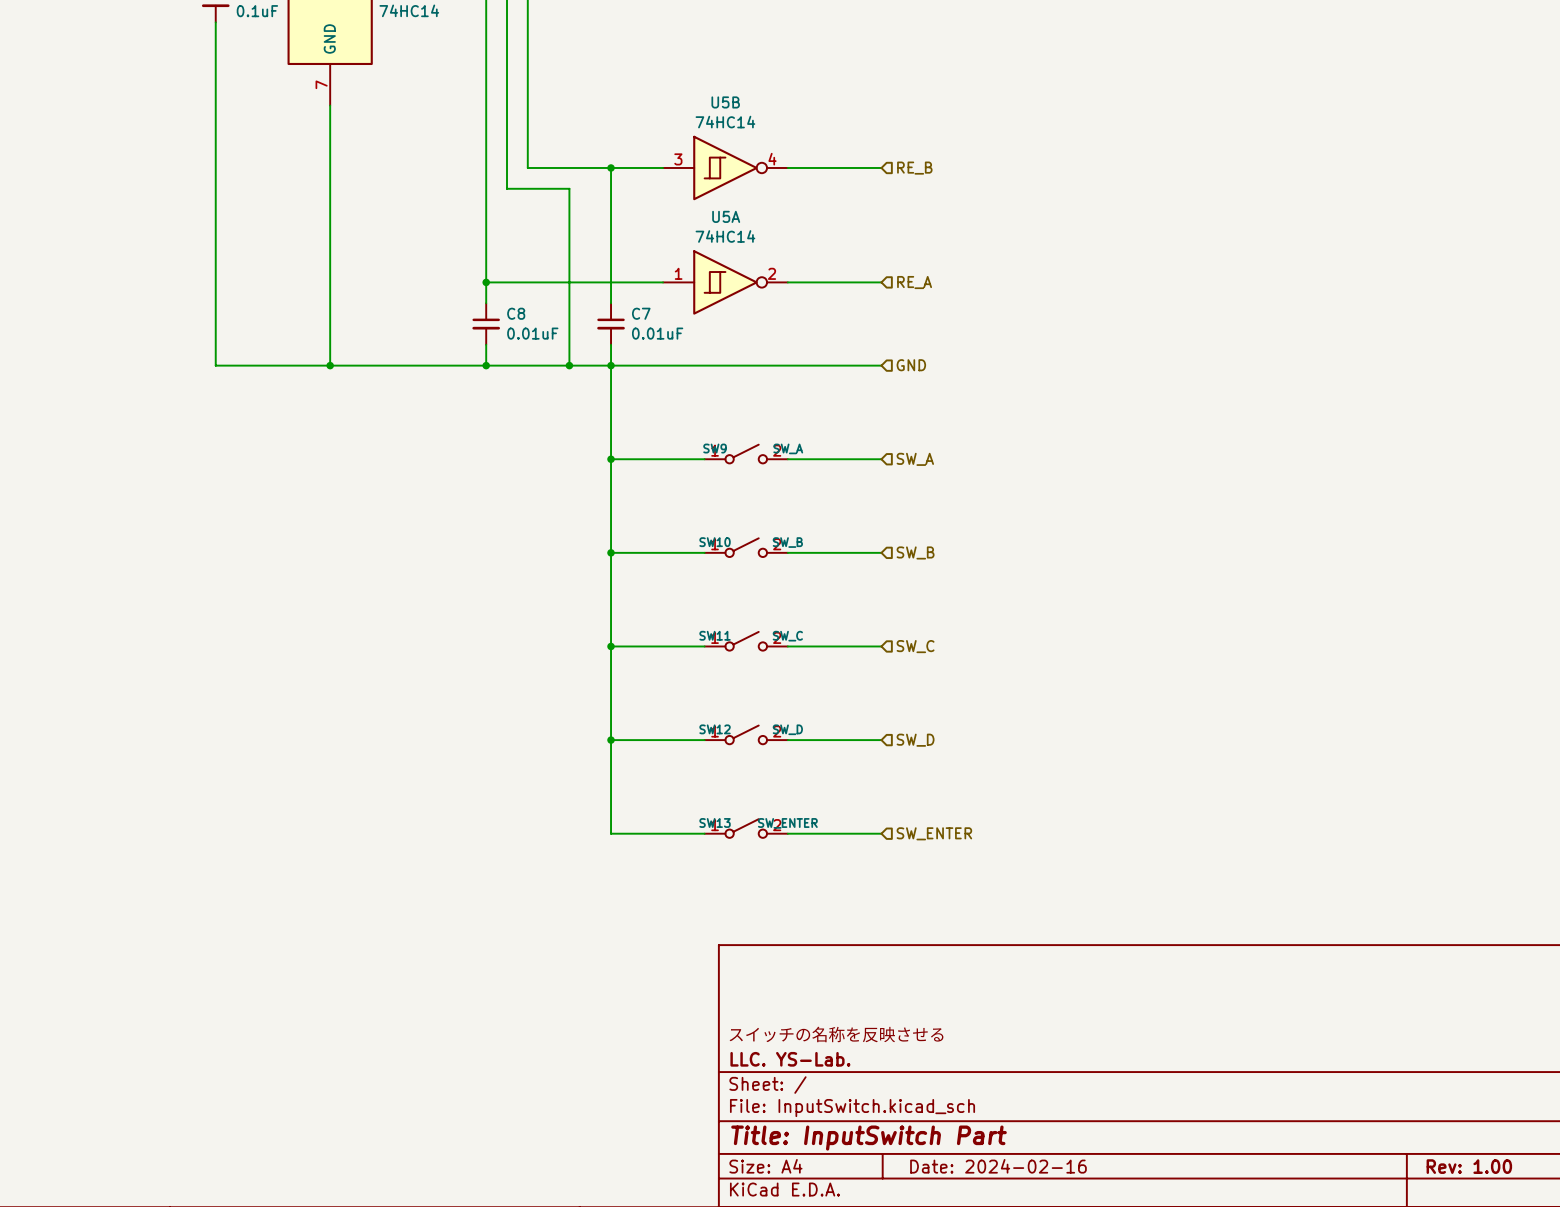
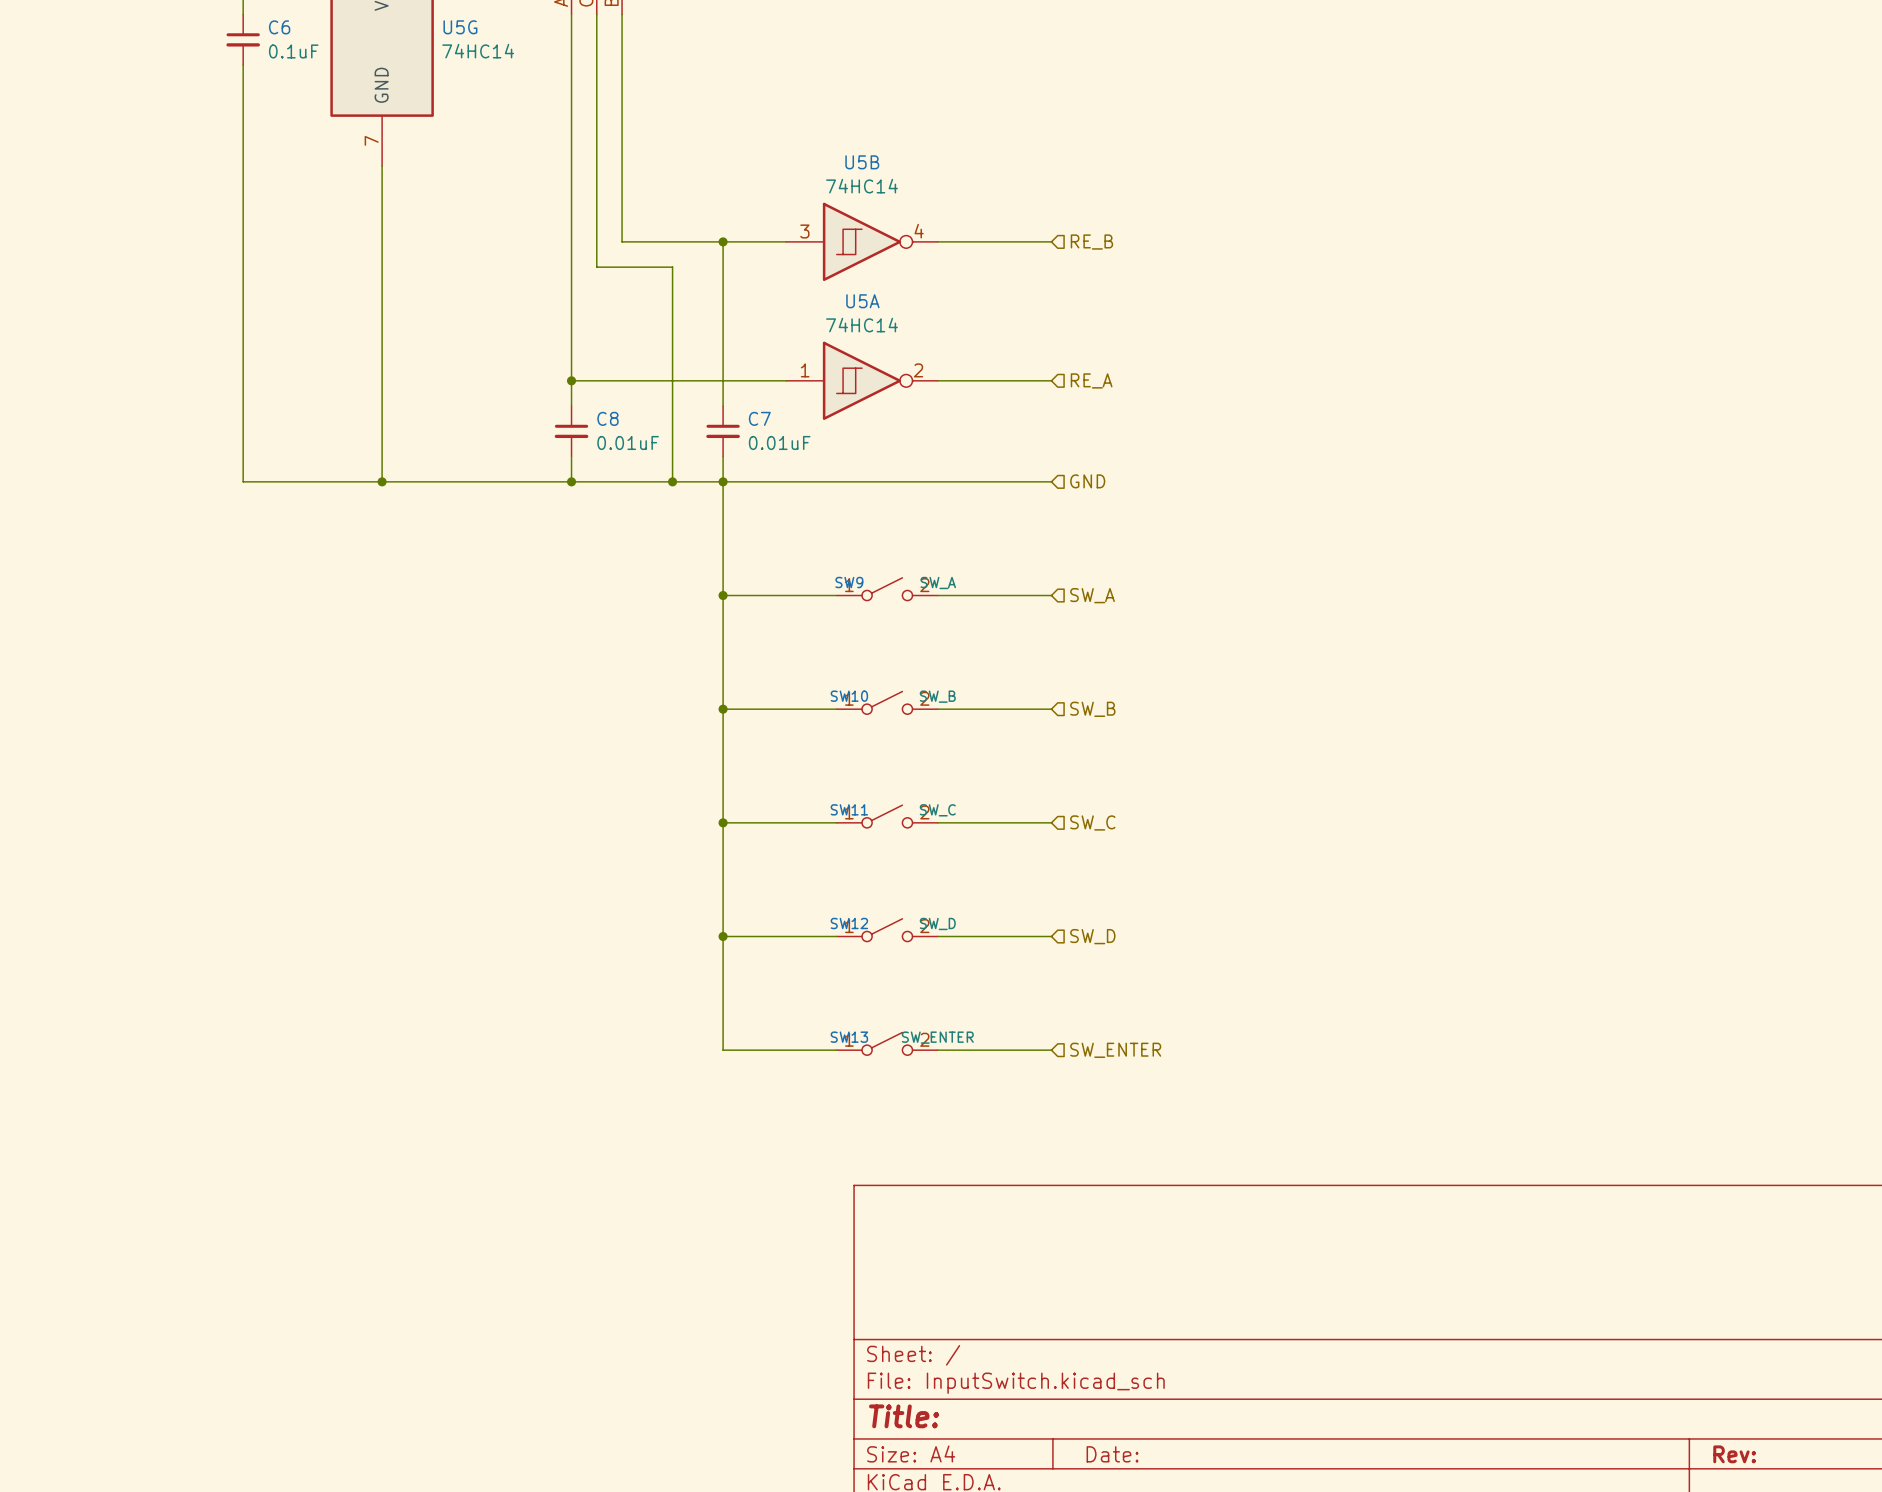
title block: スイッチの名称を反映させる (836, 1034) -> none
title block: LLC. YS-Lab. (790, 1059) -> none
title block: Title: InputSwitch Part (869, 1138) -> Title: (904, 1416)
title block: Date: 2024-02-16 (998, 1166) -> Date: (1112, 1454)
title block: Rev: 1.00 (1469, 1166) -> Rev: (1734, 1454)

